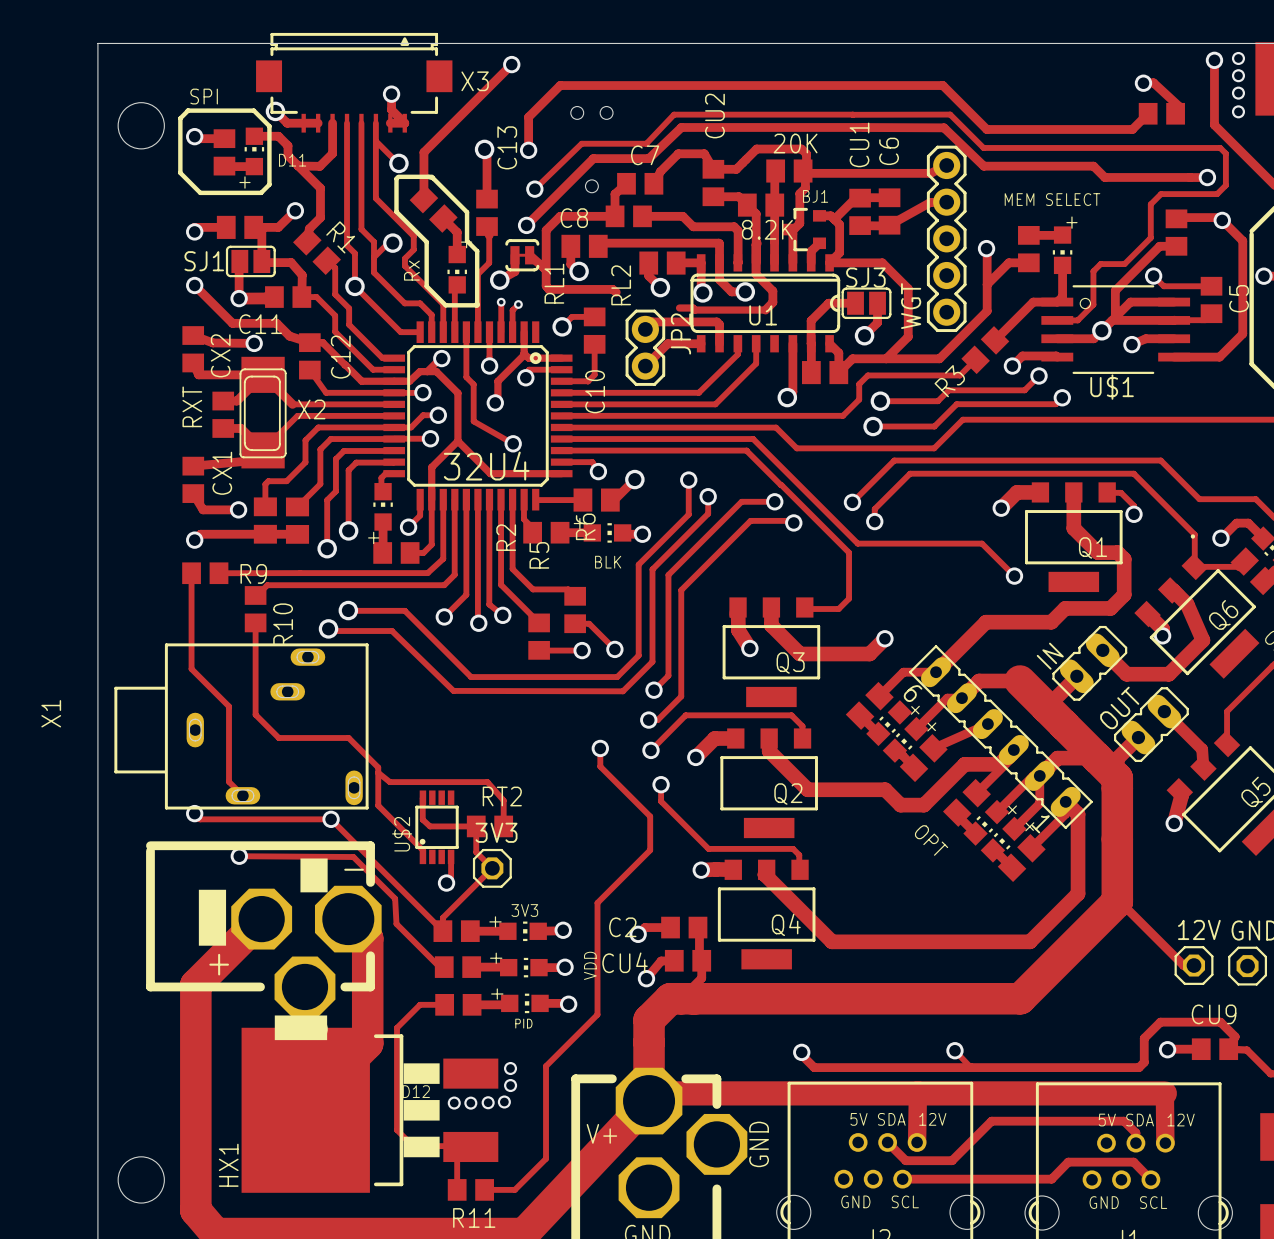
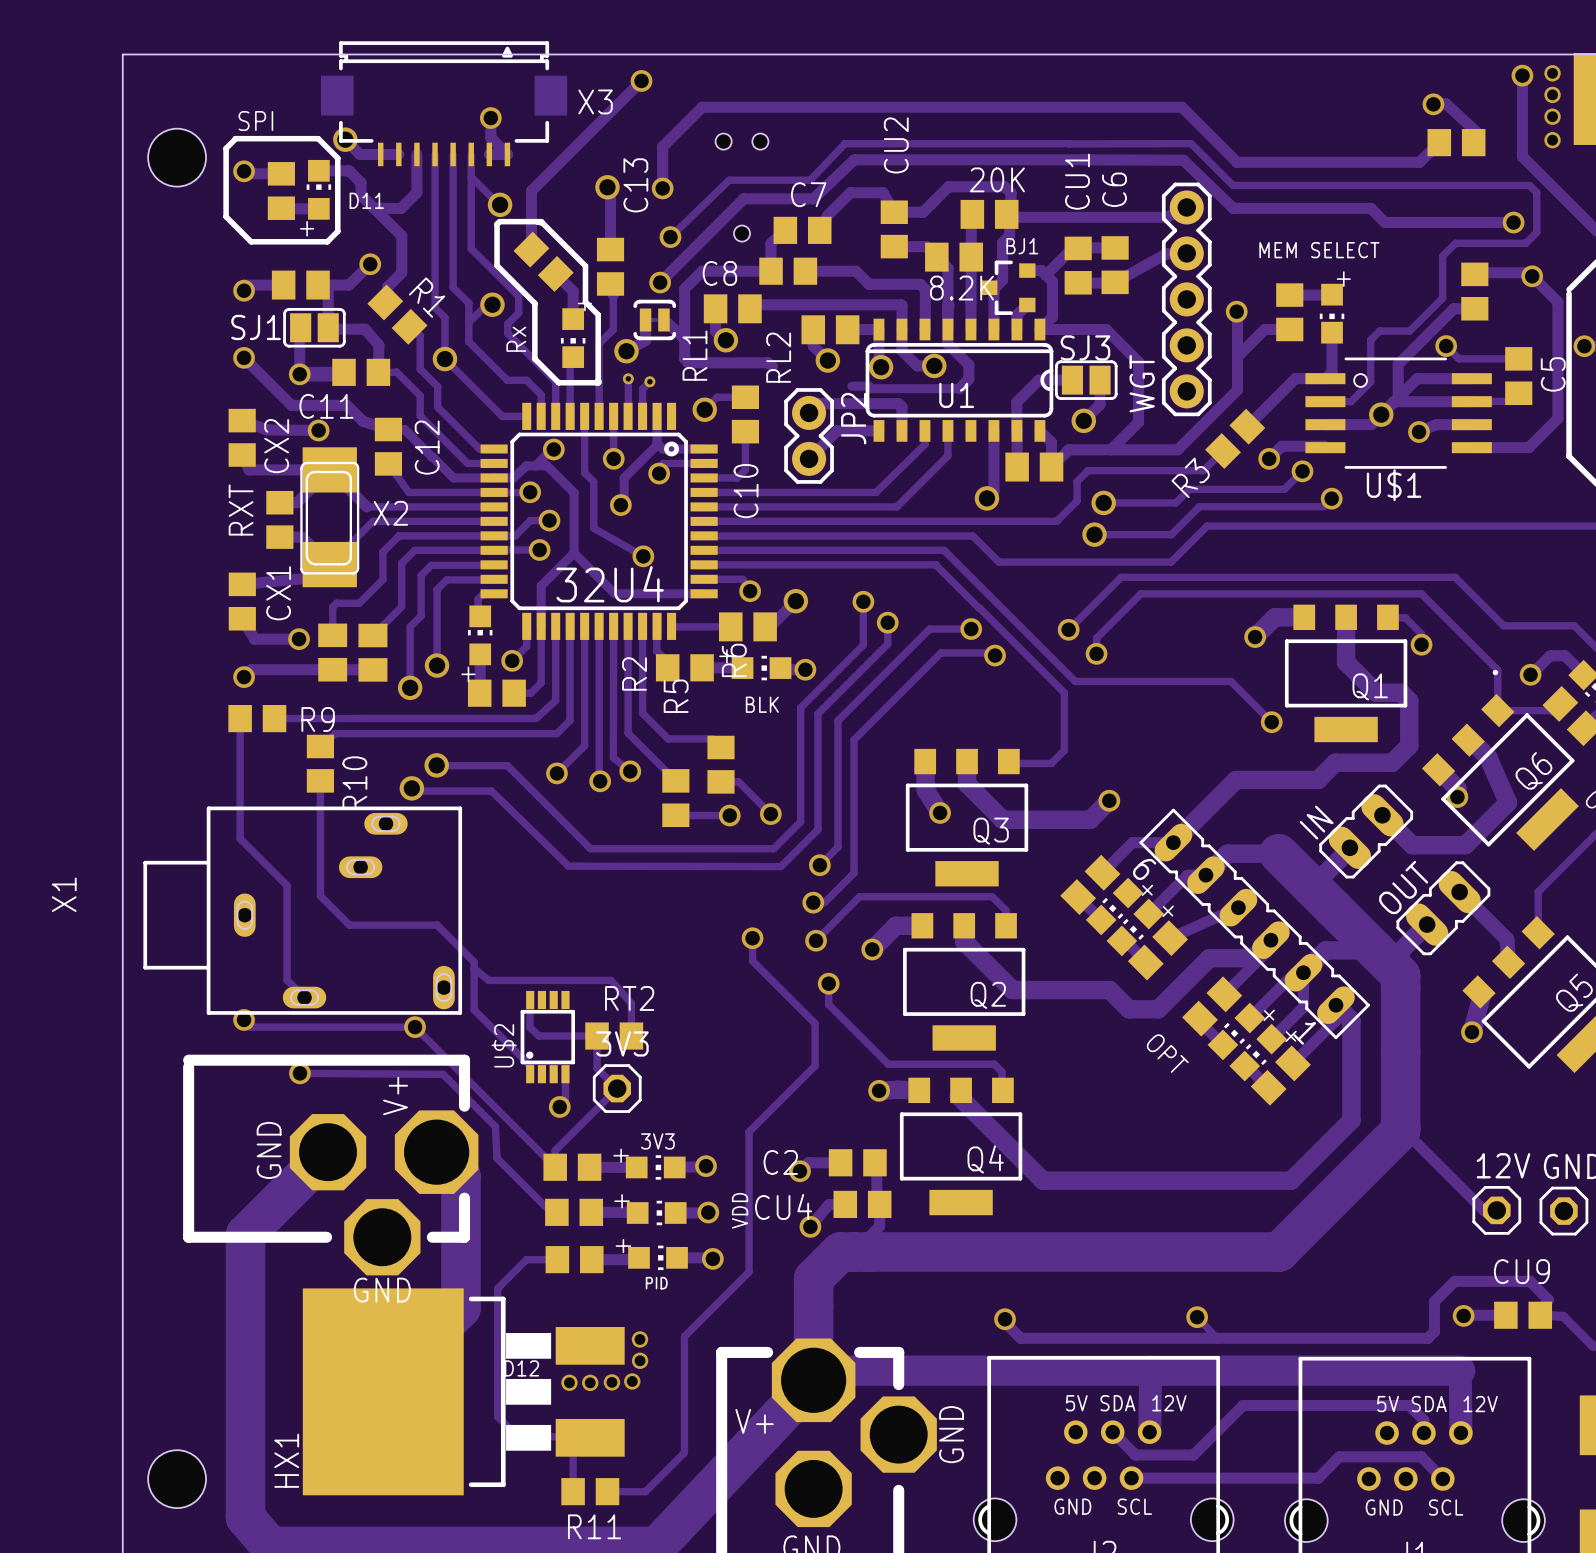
drawing: [300, 858, 328, 893] -> none
text: - (354, 869) -> none
drawing: [198, 889, 227, 946] -> none
text: + (219, 964) -> none
drawing: [274, 1015, 328, 1041] -> none

